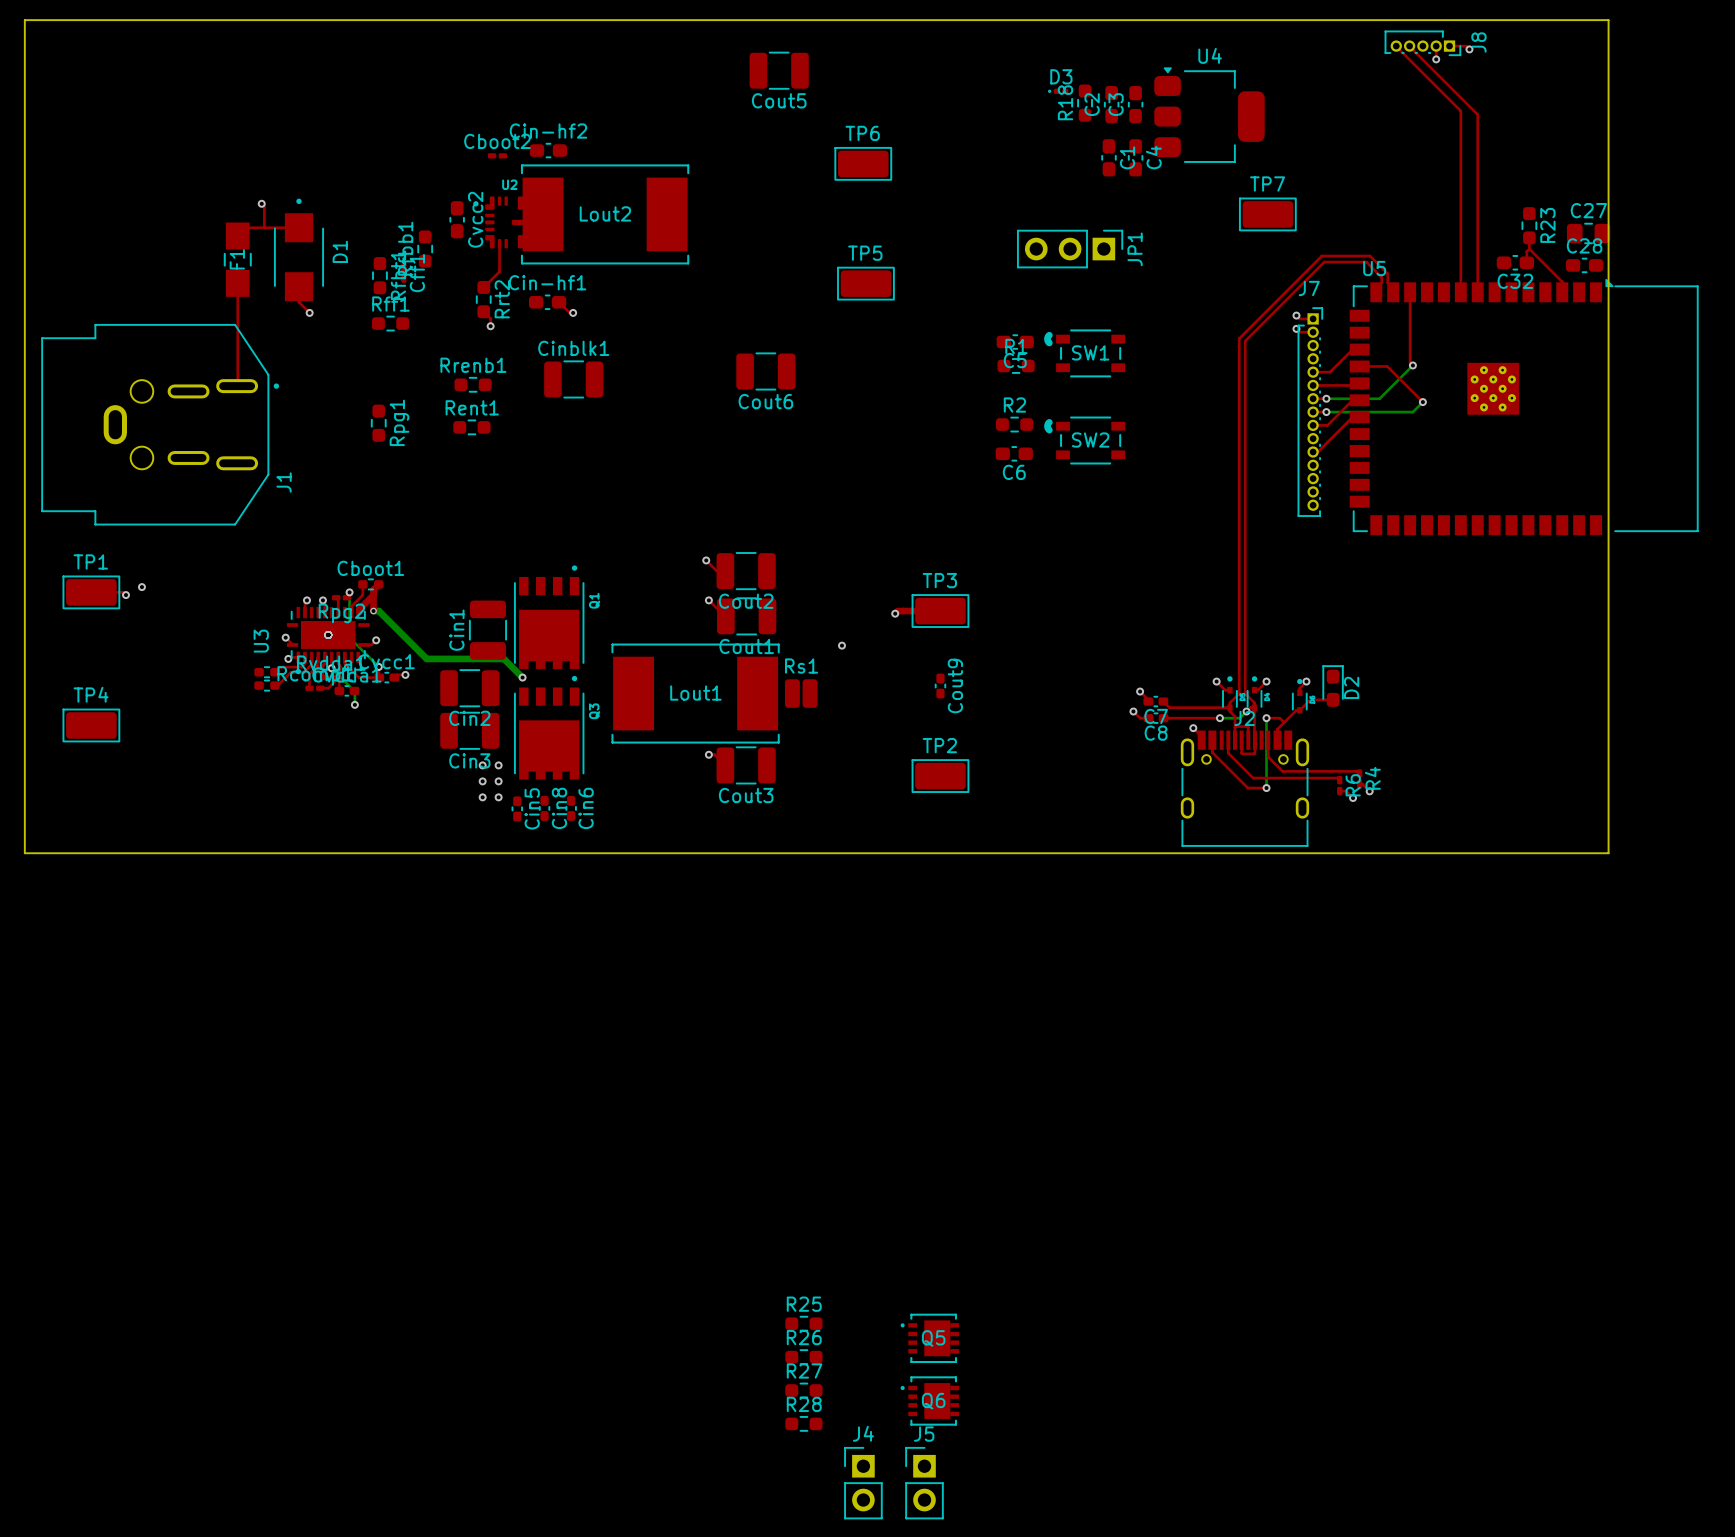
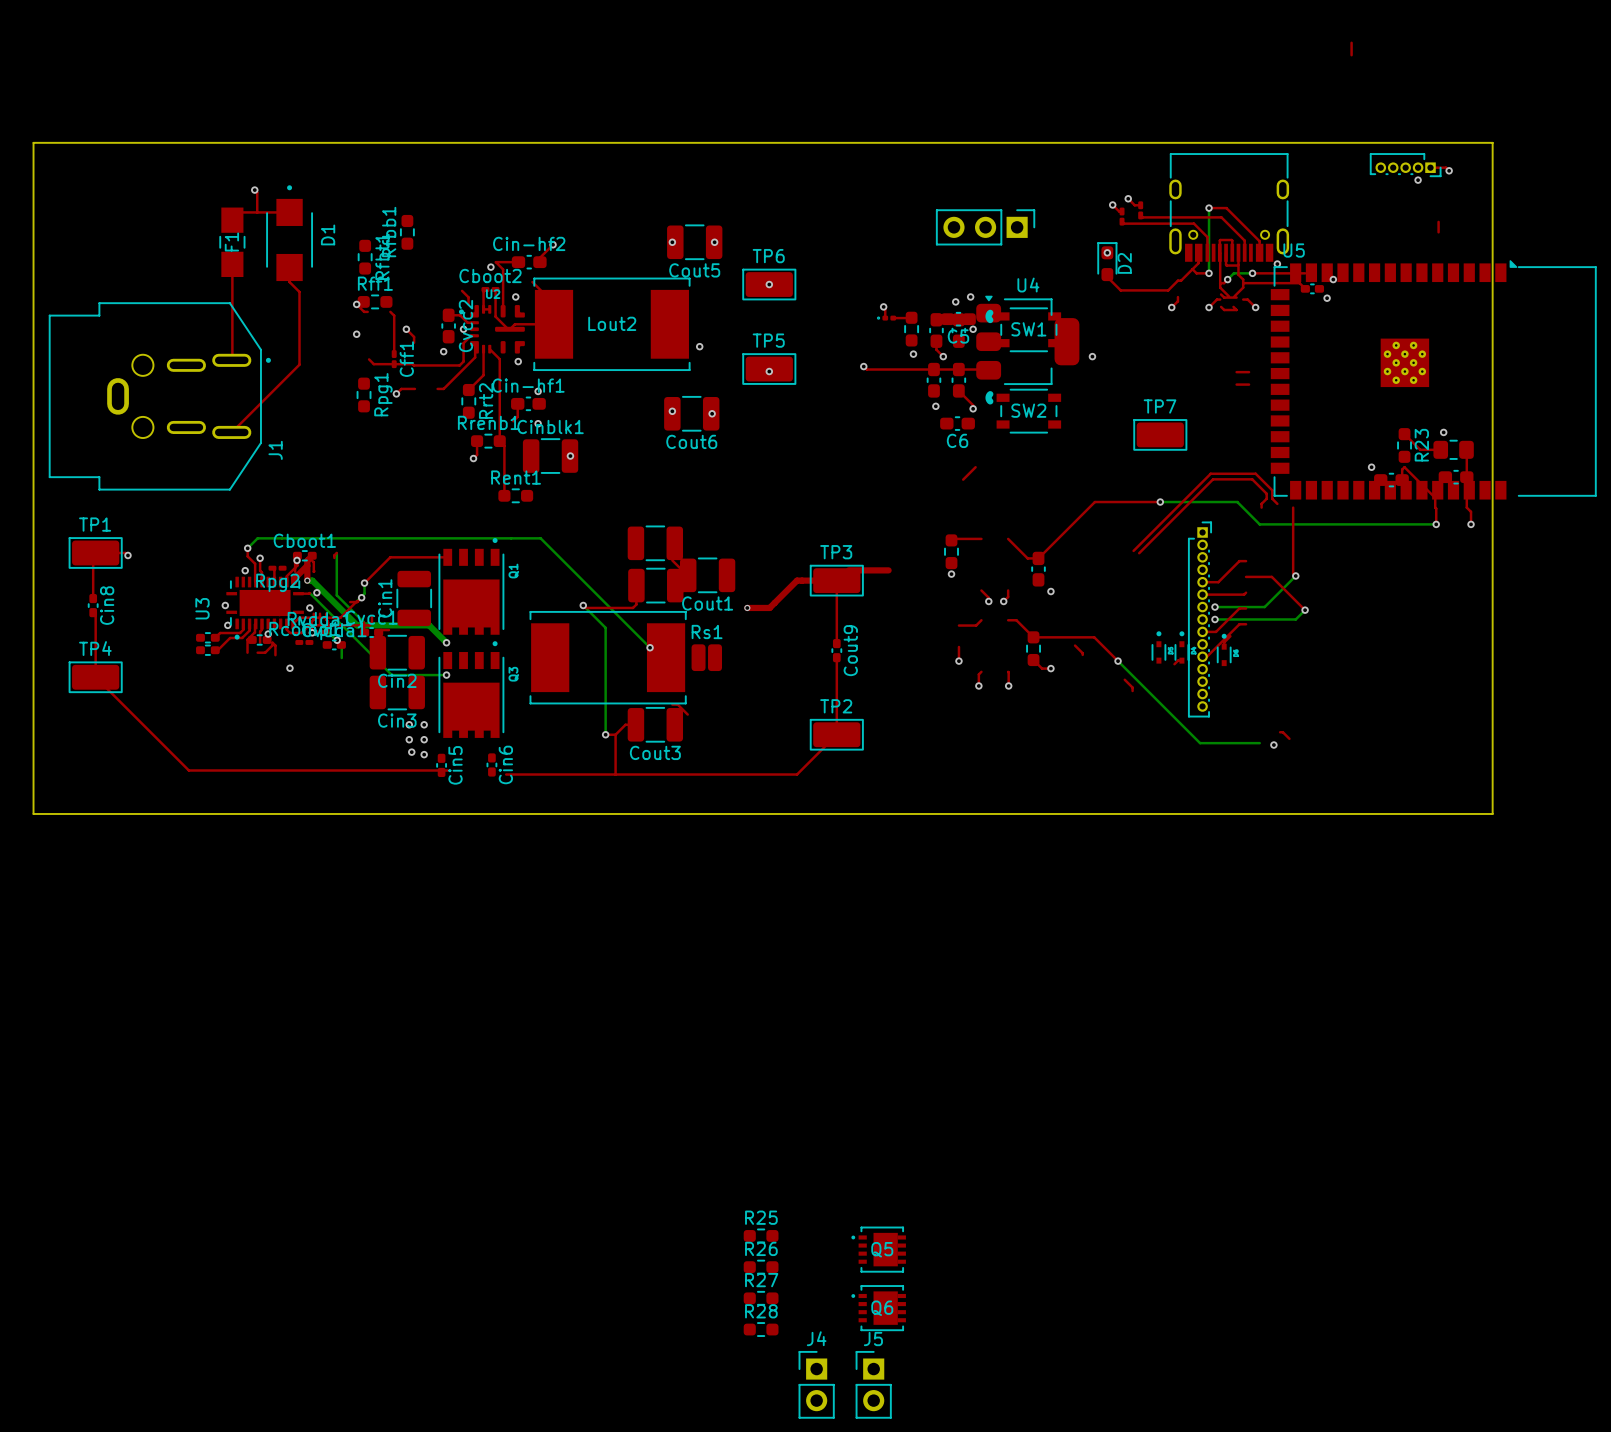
J8: (1422, 43) -> none
top track: (1396, 46) (1460, 110) (1460, 292) -> none
top track: (1409, 46) (1477, 114) (1477, 292) -> none
top track: (1449, 46) (1466, 46) (1469, 49) -> (1430, 167) (1446, 167) (1449, 170)
via: (1469, 49) -> none
via: (1436, 59) -> none
Cout5 position: (779, 70) -> (694, 242)
D3: (1058, 91) -> none
R18: (1085, 103) -> none
C2: (1111, 104) -> none
C3: (1135, 104) -> none
U4 position: (1209, 115) -> (1027, 340)
Cin-hf2 position: (548, 150) -> (529, 262)
board edge: (24, 153) (24, 20) (1608, 20) (1608, 853) (24, 853) -> (33, 142) (1492, 142) (1492, 813) (33, 813) (33, 796)
Cboot2 position: (497, 155) -> (490, 289)
C1: (1108, 157) -> none
C4: (1135, 157) -> none
TP6 position: (863, 163) -> (769, 284)
part: none -> (1405, 165)
via: none -> (1449, 170)
via: none -> (1418, 180)
top track: none -> (1128, 198) (1134, 205) (1140, 205)
via: none -> (1128, 198)
Lout2 position: (605, 214) -> (611, 324)
TP7 position: (1267, 214) -> (1160, 434)
Cvcc2 position: (457, 219) -> (448, 326)
top track: none -> (1112, 204) (1119, 211) (1122, 211)
via: none -> (1112, 204)
U2 position: (508, 222) -> (491, 329)
part: none -> (1229, 207)
top track: none -> (1209, 208) (1226, 208) (1259, 241) (1259, 252)
bottom track: none -> (1209, 208) (1209, 273)
via: none -> (1209, 208)
part: none -> (1140, 210)
R23 position: (1529, 225) -> (1404, 445)
top track: none -> (1140, 215) (1142, 217) (1221, 217) (1244, 240) (1244, 252)
part: none -> (1122, 216)
C27: (1588, 233) -> none
top track: none -> (1122, 221) (1124, 223) (1193, 223) (1207, 237) (1207, 252)
top track: (499, 243) (499, 271) (483, 287) -> (483, 349) (483, 375) (468, 390)
part: none -> (985, 227)
JP1: (1070, 249) -> none
via: none -> (672, 242)
via: none -> (714, 242)
top track: none -> (553, 244) (539, 257) (539, 262)
via: none -> (553, 244)
C32: (1515, 262) -> none
top track: (1526, 262) (1526, 251) (1529, 249) (1562, 281) (1562, 292) -> none
C28: (1584, 265) -> none
via: none -> (1107, 252)
top track: none -> (1198, 252) (1198, 263) (1168, 290) (1120, 290) (1107, 277) (1107, 274)
top track: none -> (1226, 252) (1226, 265) (1238, 264)
top track: none -> (1232, 252) (1232, 240) (1220, 240) (1220, 287) (1228, 296)
top track: none -> (1238, 252) (1238, 274) (1243, 279) (1243, 287) (1234, 296)
Cff1 position: (403, 273) -> (394, 359)
top track: none -> (518, 262) (495, 262) (503, 269) (503, 311)
via: none -> (1277, 264)
TP5 position: (865, 283) -> (769, 369)
via: none -> (490, 267)
top track: none -> (1192, 269) (1196, 273) (1209, 273)
top track: (1393, 288) (1387, 282) (1387, 273) (1370, 256) (1321, 256) (1239, 338) (1239, 693) (1229, 702) (1229, 711) (1234, 716) (1234, 740) -> none
via: none -> (1209, 273)
top track: none -> (1252, 273) (1305, 273)
bottom track: none -> (1252, 273) (1233, 273) (1227, 279)
via: none -> (1252, 273)
top track: (1376, 292) (1376, 288) (1381, 282) (1381, 277) (1366, 262) (1324, 262) (1245, 341) (1245, 693) (1254, 702) (1254, 753) (1241, 753) (1241, 740) -> none
top track: (1410, 292) (1410, 362) (1412, 365) -> (1293, 507) (1293, 573) (1295, 575)
Rrt2 position: (483, 299) -> (468, 401)
top track: none -> (1227, 279) (1224, 283) (1220, 283)
via: none -> (1227, 279)
via: none -> (1333, 279)
Cin-hf1 position: (547, 302) -> (528, 403)
top track: none -> (1243, 283) (1299, 283) (1305, 288)
via: none -> (769, 284)
part: none -> (1312, 288)
top track: none -> (485, 289) (483, 291) (483, 309) (489, 309)
top track: none -> (495, 289) (495, 316) (508, 329) (514, 324) (554, 324)
top track: none -> (299, 291) (299, 364) (231, 432)
via: (309, 312) -> none
via: (573, 312) -> none
via: (1296, 315) -> none
via: none -> (515, 296)
via: none -> (970, 296)
top track: none -> (1177, 297) (1177, 301) (1171, 307)
via: none -> (1327, 298)
top track: none -> (1220, 299) (1216, 299) (1209, 307)
top track: none -> (1243, 299) (1247, 299) (1255, 307)
via: none -> (955, 301)
top track: none -> (356, 304) (364, 311) (367, 311)
via: none -> (356, 304)
via: (490, 326) -> none
top track: none -> (883, 306) (885, 318)
via: none -> (883, 306)
via: (1296, 328) -> none
via: none -> (1171, 307)
via: none -> (1209, 307)
via: none -> (1255, 307)
top track: none -> (390, 311) (394, 315) (394, 354)
top track: none -> (448, 315) (460, 315) (467, 322) (474, 322)
part: none -> (886, 318)
top track: none -> (911, 317) (893, 318)
top track: (1359, 349) (1352, 349) (1330, 372) (1313, 372) -> (1246, 561) (1239, 561) (1218, 582) (1202, 582)
top track: none -> (406, 329) (414, 336) (414, 342)
via: none -> (406, 329)
via: none -> (463, 329)
part: none -> (911, 329)
via: none -> (973, 329)
part: none -> (936, 330)
part: none -> (958, 330)
via: none -> (356, 334)
top track: none -> (474, 335) (470, 335) (463, 343) (463, 361) (459, 365) (373, 364) (369, 359)
top track: none -> (936, 341) (936, 349) (943, 356)
R1: (1016, 365) -> none
bottom track: (1412, 365) (1379, 398) (1326, 398) -> (1295, 575) (1264, 607) (1214, 607)
via: (1412, 365) -> none
top track: (1359, 366) (1387, 366) (1422, 402) -> (1246, 576) (1271, 576) (1305, 610)
top track: none -> (475, 344) (475, 357) (443, 388) (437, 388)
via: none -> (699, 346)
Cout6 position: (765, 371) -> (691, 413)
top track: none -> (489, 349) (499, 359) (499, 441) (504, 445) (504, 495)
via: none -> (443, 351)
Cinblk1 position: (573, 379) -> (550, 456)
via: none -> (913, 354)
via: none -> (943, 356)
via: none -> (1092, 356)
top track: (1359, 383) (1357, 385) (1313, 385) -> (1246, 592) (1244, 594) (1202, 594)
Rrenb1 position: (473, 384) -> (488, 441)
via: none -> (518, 361)
top track: none -> (863, 366) (866, 369) (988, 370)
via: none -> (863, 366)
via: none -> (769, 371)
via: (1326, 398) -> none
top track: (1359, 400) (1352, 400) (1327, 425) (1313, 425) -> (1246, 608) (1239, 608) (1216, 631) (1202, 631)
bottom track: (1422, 402) (1412, 412) (1326, 412) -> (1305, 610) (1295, 619) (1214, 619)
via: (1422, 402) -> none
part: none -> (933, 380)
part: none -> (958, 380)
J7: (1310, 412) -> none
via: (1326, 412) -> none
top track: none -> (414, 388) (401, 388) (396, 393)
top track: (1359, 417) (1352, 417) (1317, 451) (1313, 451) -> (1246, 624) (1239, 624) (1206, 656) (1202, 656)
top track: none -> (958, 390) (973, 405) (973, 408)
via: none -> (538, 391)
via: none -> (396, 393)
R2: (1014, 424) -> none
Rent1 position: (471, 427) -> (515, 495)
top track: none -> (517, 403) (517, 416) (513, 421)
via: none -> (935, 406)
via: none -> (973, 408)
via: none -> (672, 411)
via: none -> (712, 413)
via: none -> (538, 423)
via: none -> (1443, 432)
top track: none -> (1404, 434) (1420, 449) (1440, 449)
top track: none -> (477, 441) (477, 454) (473, 458)
part: none -> (1453, 449)
top track: none -> (1466, 449) (1466, 507) (1471, 511) (1471, 524)
via: none -> (570, 456)
via: none -> (473, 458)
top track: none -> (975, 467) (963, 479)
via: none -> (1371, 467)
part: none -> (1456, 477)
part: none -> (1391, 480)
top track: none -> (1402, 480) (1402, 469) (1404, 467) (1435, 497) (1436, 524)
top track: none -> (1160, 502) (1094, 502) (1038, 558) (1027, 558) (1008, 538)
bottom track: none -> (1160, 502) (1237, 502) (1259, 524) (1436, 524)
via: none -> (1160, 502)
top track: none -> (1277, 503) (1272, 498) (1272, 490) (1255, 473) (1210, 473) (1133, 550)
top track: none -> (1261, 507) (1261, 503) (1266, 498) (1266, 493) (1252, 479) (1213, 479) (1139, 553)
top track: (706, 560) (716, 571) (725, 571) -> none
via: (706, 560) -> none
via: none -> (1436, 524)
via: none -> (1471, 524)
Cout2: (746, 571) -> none
top track: none -> (981, 538) (951, 540)
part: none -> (655, 543)
top track: (362, 584) (362, 594) (351, 606) (351, 612) -> (297, 555) (297, 565) (286, 576) (286, 582)
Cboot1 position: (370, 584) -> (304, 555)
top track: (378, 584) (373, 589) (373, 611) -> (312, 555) (307, 560) (307, 580)
via: (141, 587) -> none
top track: none -> (247, 548) (247, 556) (255, 563) (255, 581) (256, 580)
bottom track: none -> (247, 548) (257, 538) (540, 538) (650, 647)
via: none -> (247, 548)
part: none -> (951, 551)
top track: none -> (95, 552) (93, 555) (93, 598)
via: (349, 592) -> none
top track: (373, 595) (359, 609) (359, 612) -> (307, 565) (294, 578) (294, 582)
top track: (336, 597) (338, 599) (338, 612) -> (272, 568) (274, 570) (274, 582)
Rpg2 position: (341, 597) -> (277, 568)
top track: none -> (447, 557) (390, 557) (364, 583)
top track: none -> (260, 558) (262, 581)
via: none -> (260, 558)
via: (322, 600) -> none
via: (708, 600) -> none
part: none -> (1038, 569)
via: none -> (245, 570)
bottom track: (373, 611) (378, 611) (426, 658) (503, 658) (522, 677) -> (307, 580) (312, 580) (357, 625) (429, 625) (446, 642)
via position: (373, 611) -> (307, 580)
TP3 position: (940, 611) -> (836, 580)
via: (895, 613) -> none
via: none -> (951, 574)
Q1 position: (549, 617) -> (471, 586)
via: none -> (1295, 575)
bottom track: none -> (364, 583) (364, 593) (357, 601)
via: none -> (364, 583)
top track: none -> (635, 585) (636, 604) (632, 607) (585, 607) (583, 605)
part: none -> (655, 585)
Cin1 position: (487, 630) -> (414, 598)
top track: none -> (981, 590) (988, 597) (988, 601)
top track: none -> (1008, 590) (1008, 597) (1003, 601)
via: none -> (1050, 591)
top track: none -> (309, 593) (298, 593)
bottom track: none -> (309, 593) (391, 675) (446, 675)
via: (285, 637) -> none
U3 position: (328, 640) -> (265, 608)
top track: none -> (357, 601) (340, 617) (299, 617) (293, 623)
via: none -> (988, 601)
via: none -> (1003, 601)
via: (841, 645) -> none
via: none -> (225, 605)
bottom track: none -> (583, 605) (605, 627) (605, 734)
via: none -> (583, 605)
via: none -> (1214, 607)
via: none -> (309, 607)
top track: none -> (747, 607) (769, 607) (797, 580) (836, 580) (836, 643)
via: none -> (747, 607)
via: none -> (1305, 610)
top track: none -> (93, 612) (95, 615) (95, 677) (188, 770) (448, 770)
top track: (304, 657) (304, 663) (301, 667) (280, 667) (274, 672) -> (243, 623) (243, 629) (240, 633) (220, 633) (215, 637)
top track: (311, 657) (311, 664) (303, 672) (290, 672) (277, 685) (274, 685) -> (249, 623) (249, 630) (242, 638) (230, 638) (217, 650) (215, 650)
top track: (318, 657) (317, 666) (309, 674) (309, 688) -> (255, 623) (254, 632) (247, 639) (247, 652)
top track: (344, 657) (344, 663) (358, 677) (375, 677) -> none
via: (288, 658) -> none
top track: none -> (371, 616) (371, 622) (369, 625) (309, 625) (301, 633) (290, 633) (286, 629) (286, 623)
part: none -> (1199, 619)
via: none -> (1214, 619)
top track: none -> (981, 620) (976, 625) (958, 625)
top track: none -> (1008, 620) (1016, 620) (1033, 637) (1094, 637) (1118, 661)
via: (378, 666) -> none
top track: none -> (261, 623) (260, 642)
via: (331, 668) -> none
via: none -> (227, 625)
part: (267, 672) -> none
via: (405, 674) -> none
via: none -> (312, 632)
via: (522, 677) -> none
via: none -> (268, 634)
top track: (1216, 681) (1225, 690) (1229, 690) -> none
via: (1216, 681) -> none
top track: (1266, 681) (1258, 690) (1254, 690) -> none
via: (1266, 681) -> none
via: (1306, 681) -> none
part: none -> (207, 637)
via: none -> (337, 640)
Cout9 position: (940, 685) -> (836, 650)
D2 position: (1333, 686) -> (1107, 261)
top track: (320, 688) (328, 688) (336, 680) (336, 677) (339, 680) (339, 690) -> (257, 652) (265, 652) (272, 642) (275, 645) (275, 655)
via: none -> (446, 642)
Cin2 position: (469, 688) -> (397, 652)
via: (1140, 691) -> none
via: none -> (650, 647)
Lout1: (695, 693) -> none
Rs1 position: (801, 693) -> (706, 657)
top track: none -> (958, 646) (958, 661)
part: none -> (1033, 648)
part: none -> (207, 650)
top track: (1333, 699) (1310, 699) (1277, 729) (1277, 740) -> none
C7: (1155, 701) -> none
top track: (1163, 701) (1169, 707) (1229, 707) -> none
via: (354, 704) -> none
part: none -> (608, 657)
top track: none -> (836, 657) (836, 734) (797, 774) (506, 774)
top track: none -> (1033, 660) (1042, 668) (1050, 668)
via: none -> (958, 661)
bottom track: none -> (1118, 661) (1200, 743) (1259, 743)
via: none -> (1118, 661)
top track: (1133, 711) (1140, 718) (1148, 718) -> none
via: (1133, 711) -> none
bottom track: (1246, 711) (1239, 718) (1219, 718) -> none
via: (1246, 711) -> none
via: none -> (289, 668)
via: none -> (1050, 668)
C8: (1156, 718) -> none
top track: (1163, 718) (1219, 718) -> none
via: (1219, 718) -> none
top track: (1266, 718) (1279, 718) (1284, 722) -> none
bottom track: (1266, 718) (1266, 788) -> none
via: (1266, 718) -> none
top track: none -> (981, 671) (978, 674) (978, 685)
top track: none -> (1008, 671) (1008, 685)
via: none -> (446, 675)
Q3 position: (549, 727) -> (471, 689)
top track: (1234, 727) (1247, 726) (1248, 740) -> none
via: (1193, 728) -> none
Cin3 position: (469, 730) -> (397, 692)
via: none -> (978, 685)
via: none -> (1008, 685)
top track: (1212, 740) (1212, 752) (1247, 788) (1266, 788) -> none
top track: (1228, 740) (1228, 753) (1253, 778) (1337, 778) (1339, 780) -> none
top track: (1268, 740) (1268, 756) (1282, 771) (1357, 771) (1359, 773) -> none
via: (708, 754) -> none
via: (482, 765) -> none
via: (498, 765) -> none
Cout3 position: (746, 765) -> (655, 724)
via: none -> (409, 724)
via: none -> (424, 724)
top track: none -> (635, 724) (625, 724) (615, 734)
TP2 position: (940, 776) -> (836, 734)
R4: (1359, 778) -> none
via: (482, 781) -> none
via: (498, 781) -> none
R6: (1339, 785) -> none
top track: none -> (605, 734) (615, 734)
via: none -> (605, 734)
top track: none -> (615, 734) (615, 774)
J2: (1244, 788) -> none
via: (1266, 788) -> none
top track: (1339, 791) (1346, 791) (1353, 798) -> none
via: (1369, 791) -> none
via: none -> (409, 739)
via: none -> (424, 739)
via: (482, 797) -> none
via: (498, 797) -> none
via: none -> (411, 752)
via: none -> (424, 754)
Cin5 position: (517, 808) -> (441, 765)
Cin8 position: (544, 808) -> (93, 605)
Cin6 position: (571, 808) -> (491, 764)

